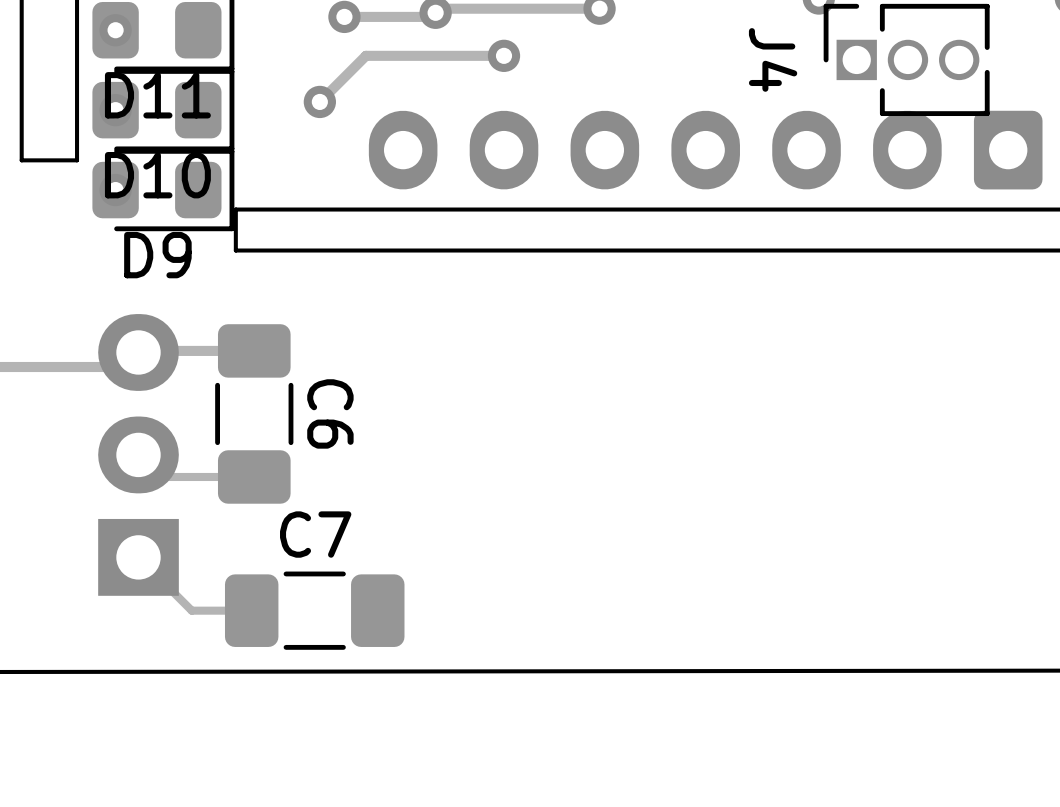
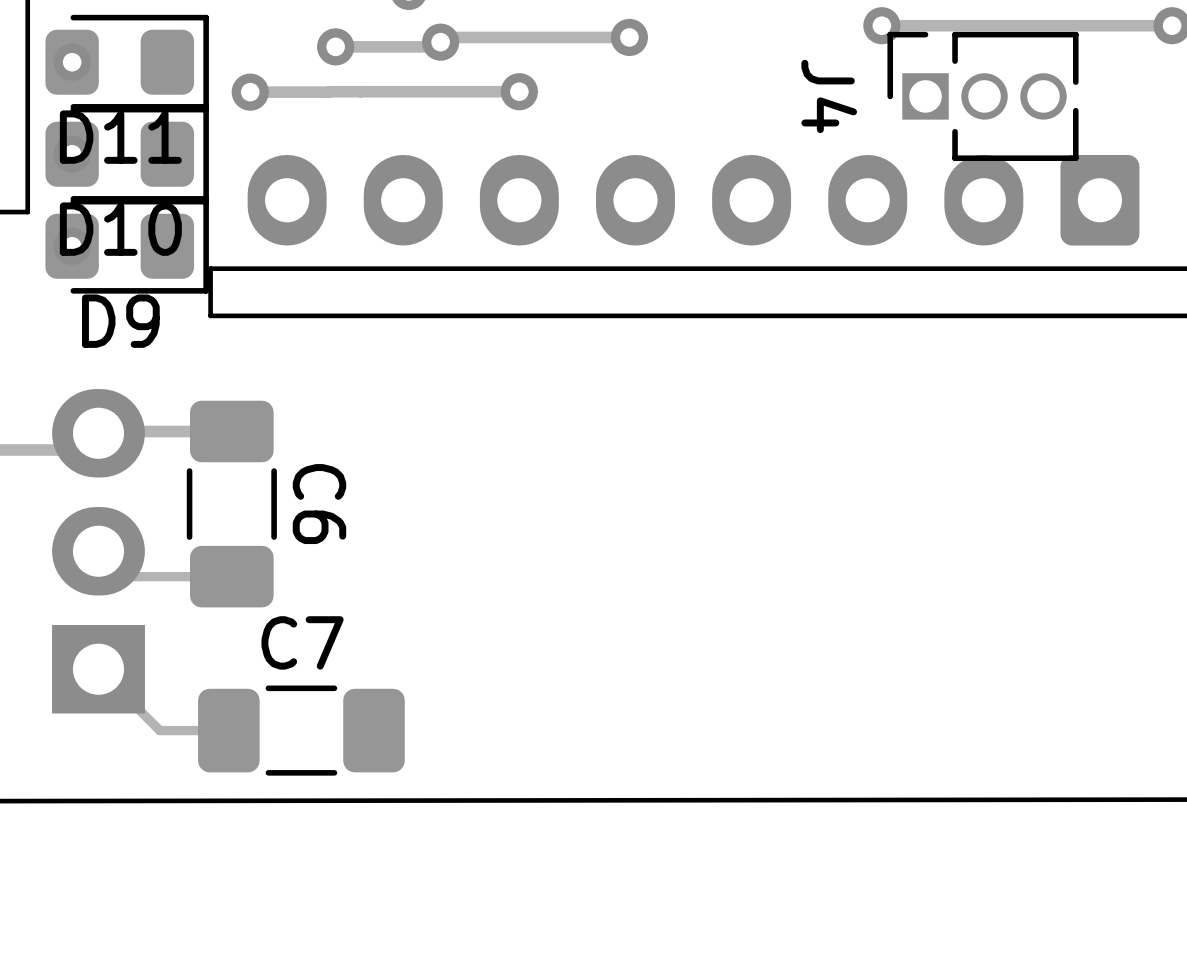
track: (365, 55) (319, 101) -> (360, 91) (250, 92)
via position: (319, 101) -> (250, 92)
part: none -> (693, 200)

